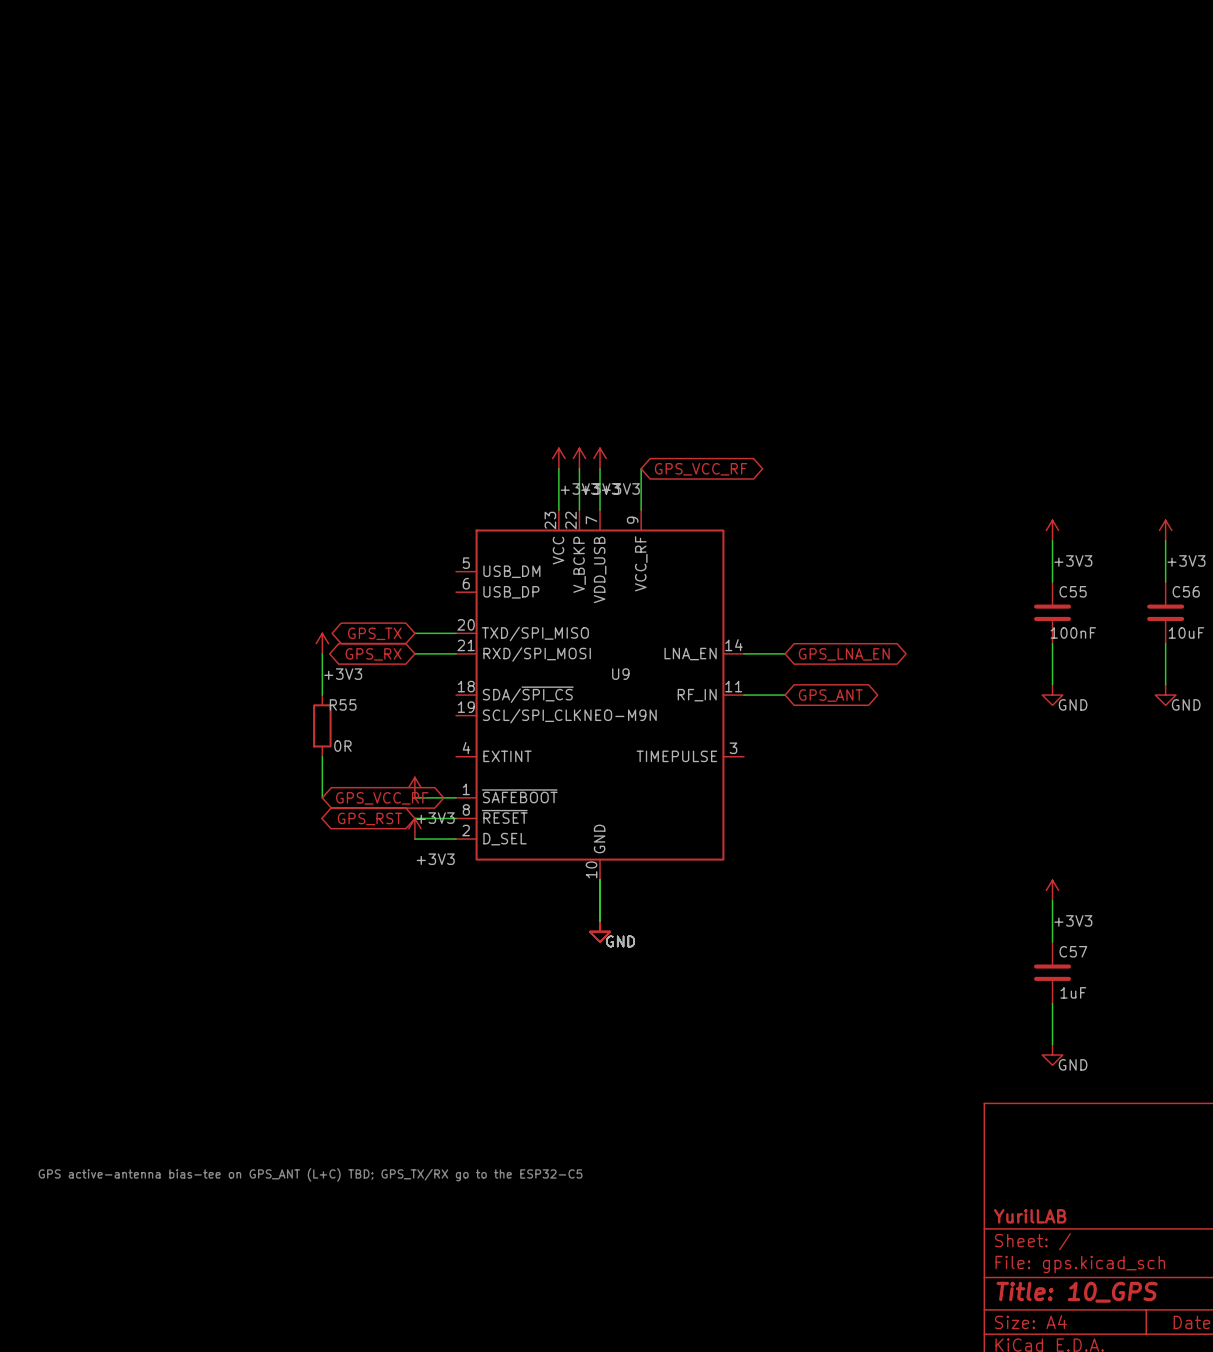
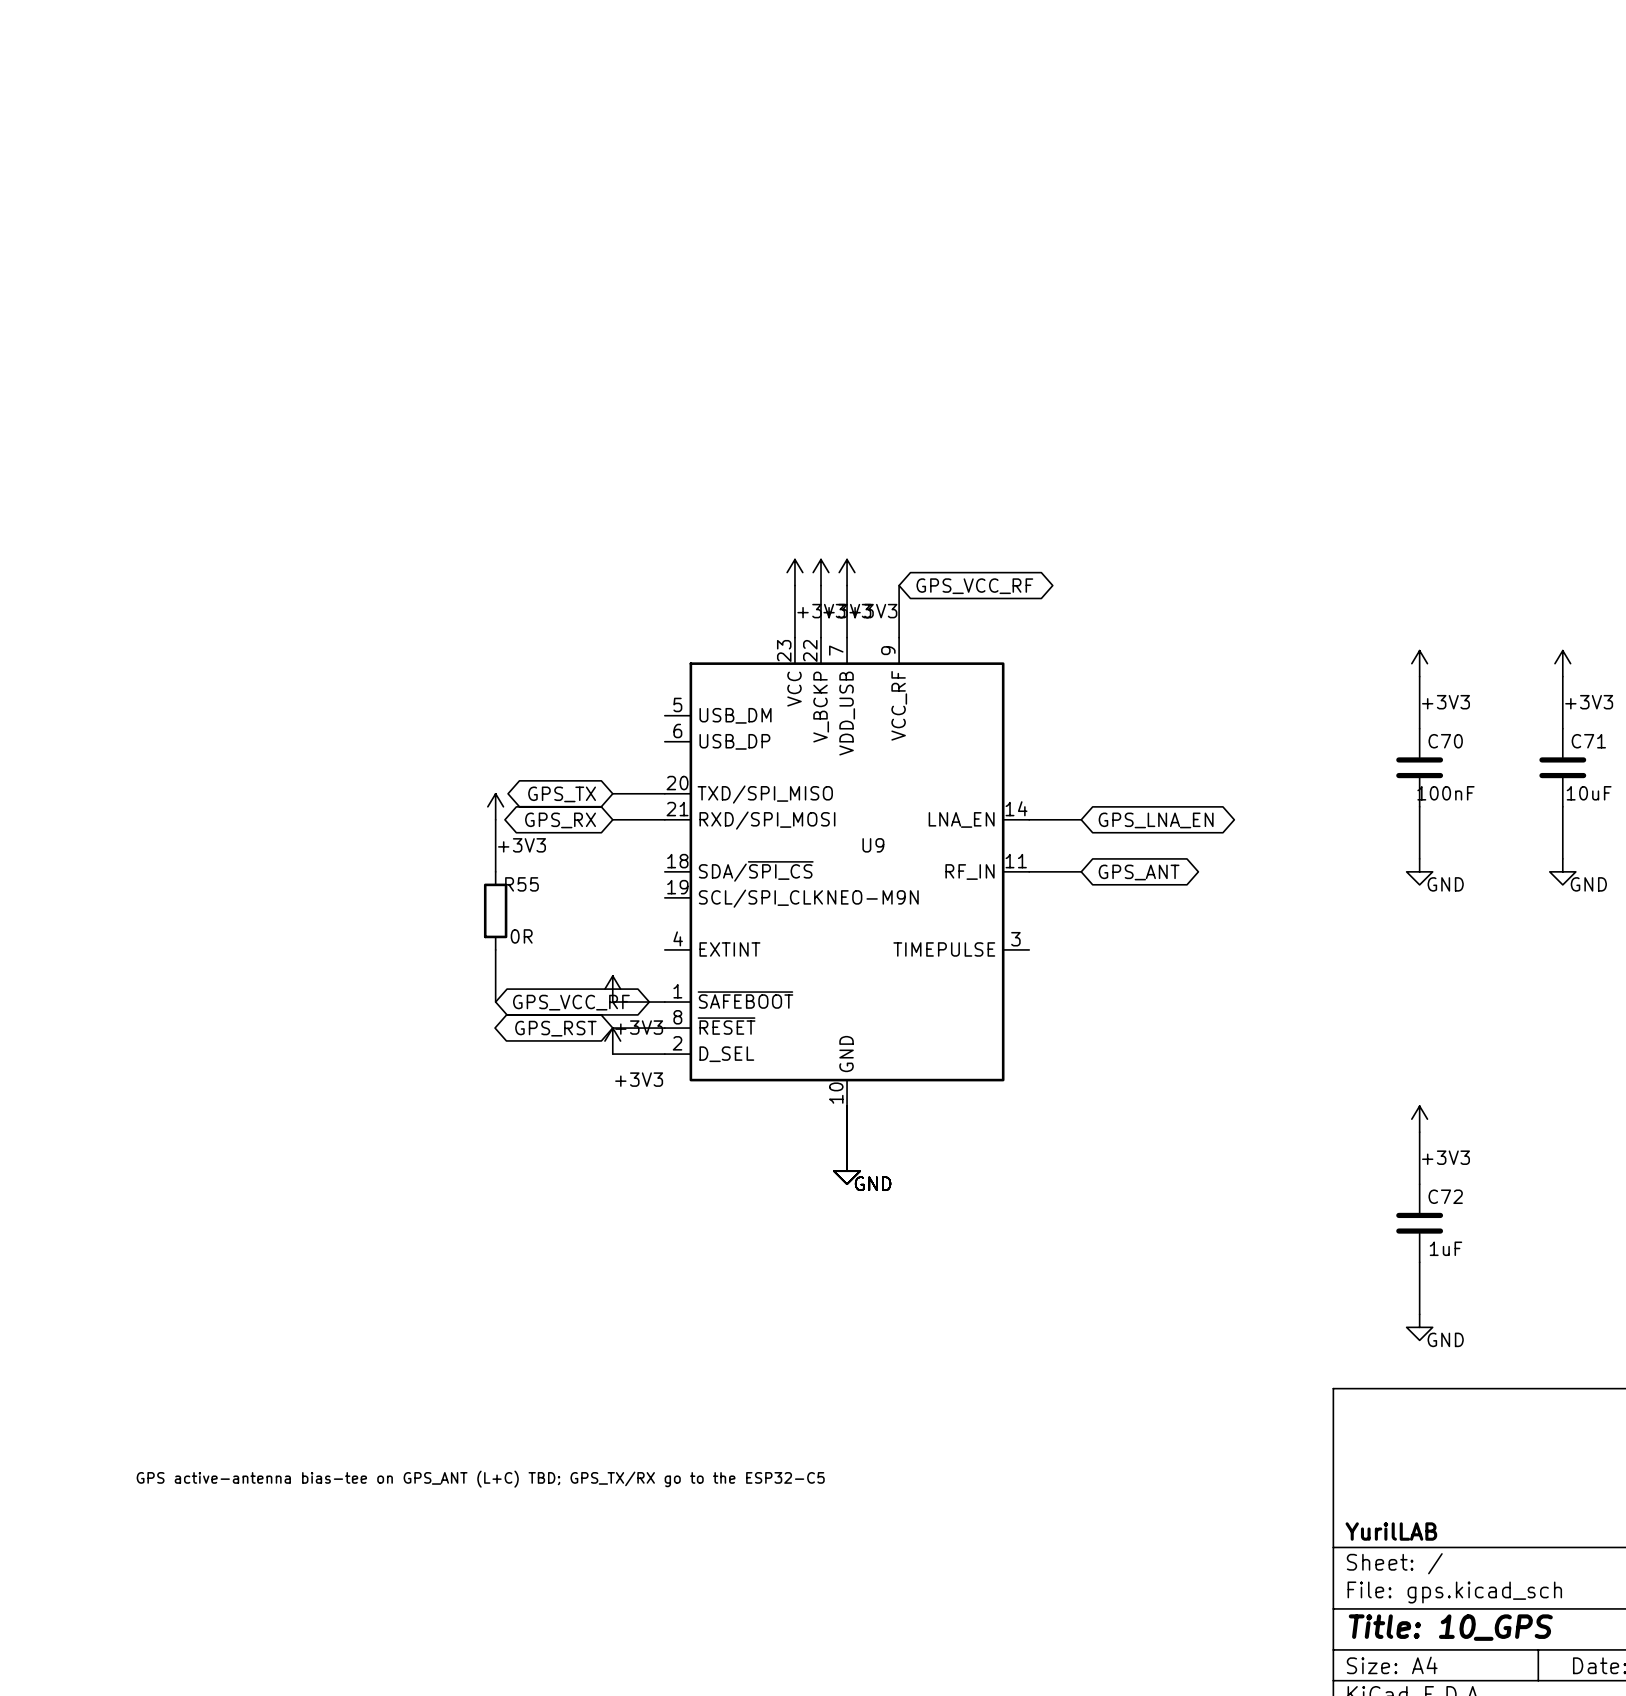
C55 name: C55 (1073, 591) -> C70 (1445, 741)
C56 name: C56 (1186, 591) -> C71 (1588, 741)
C57 name: C57 (1073, 951) -> C72 (1445, 1196)

